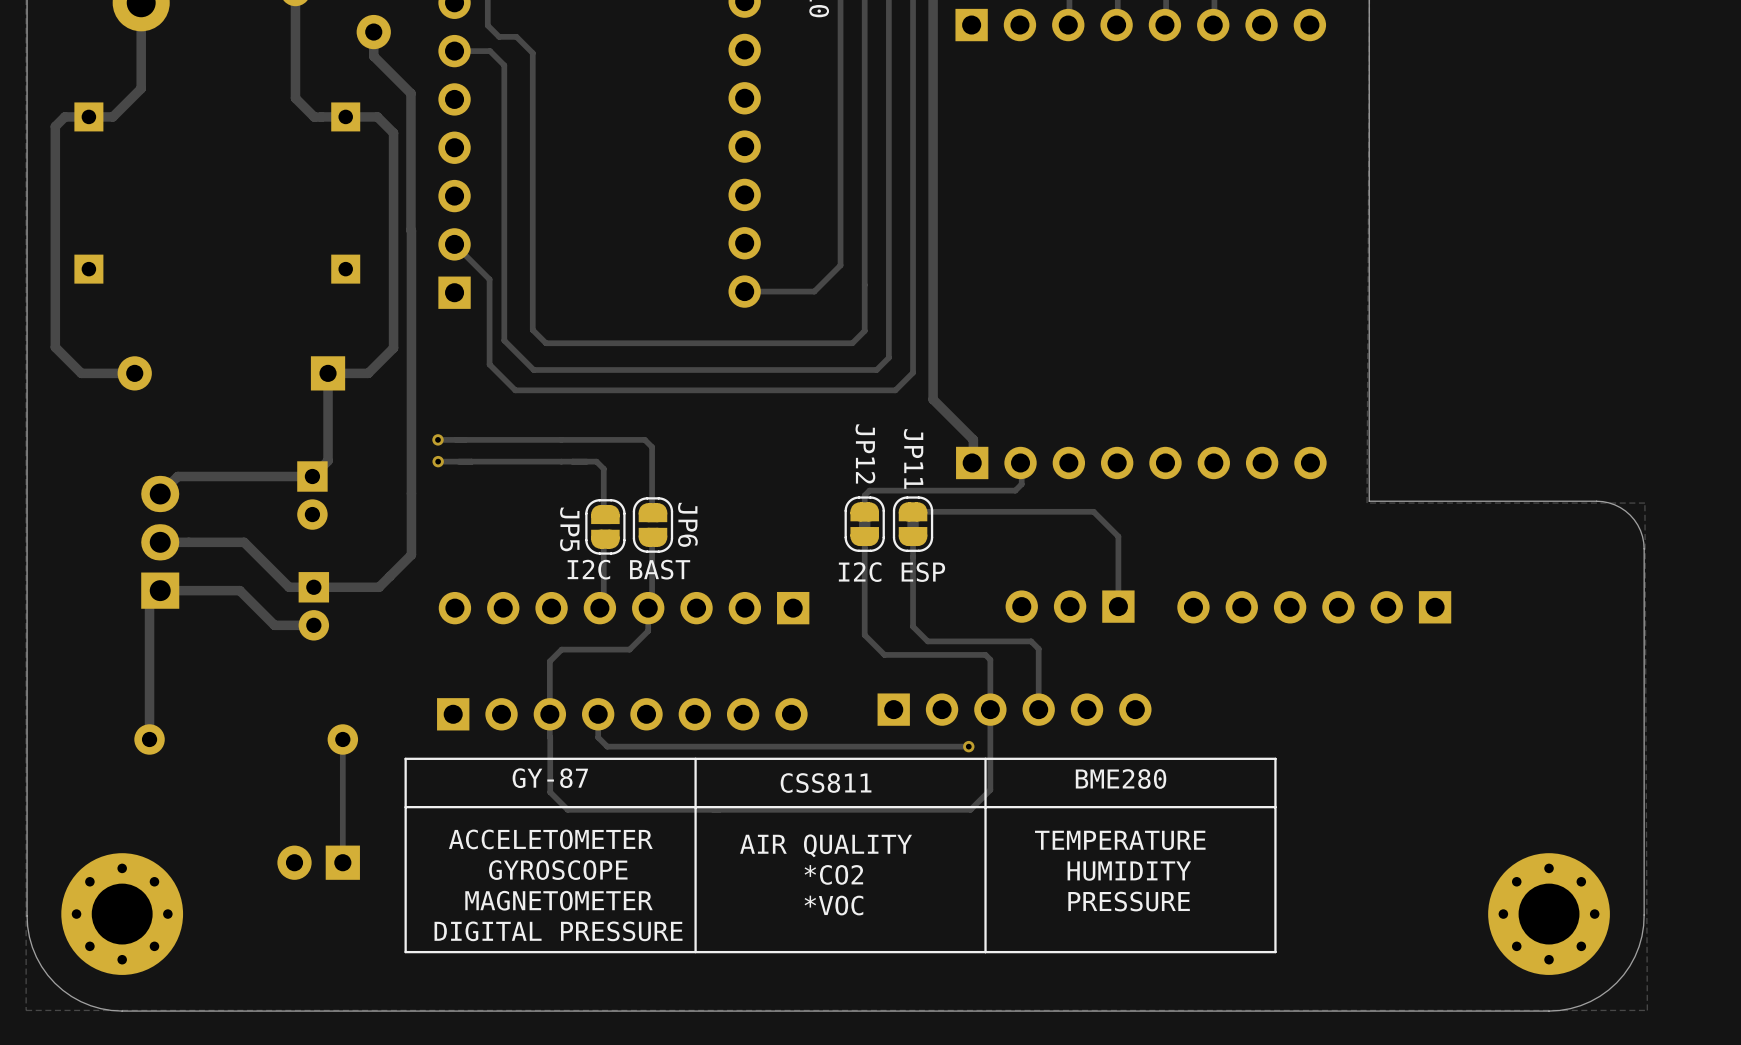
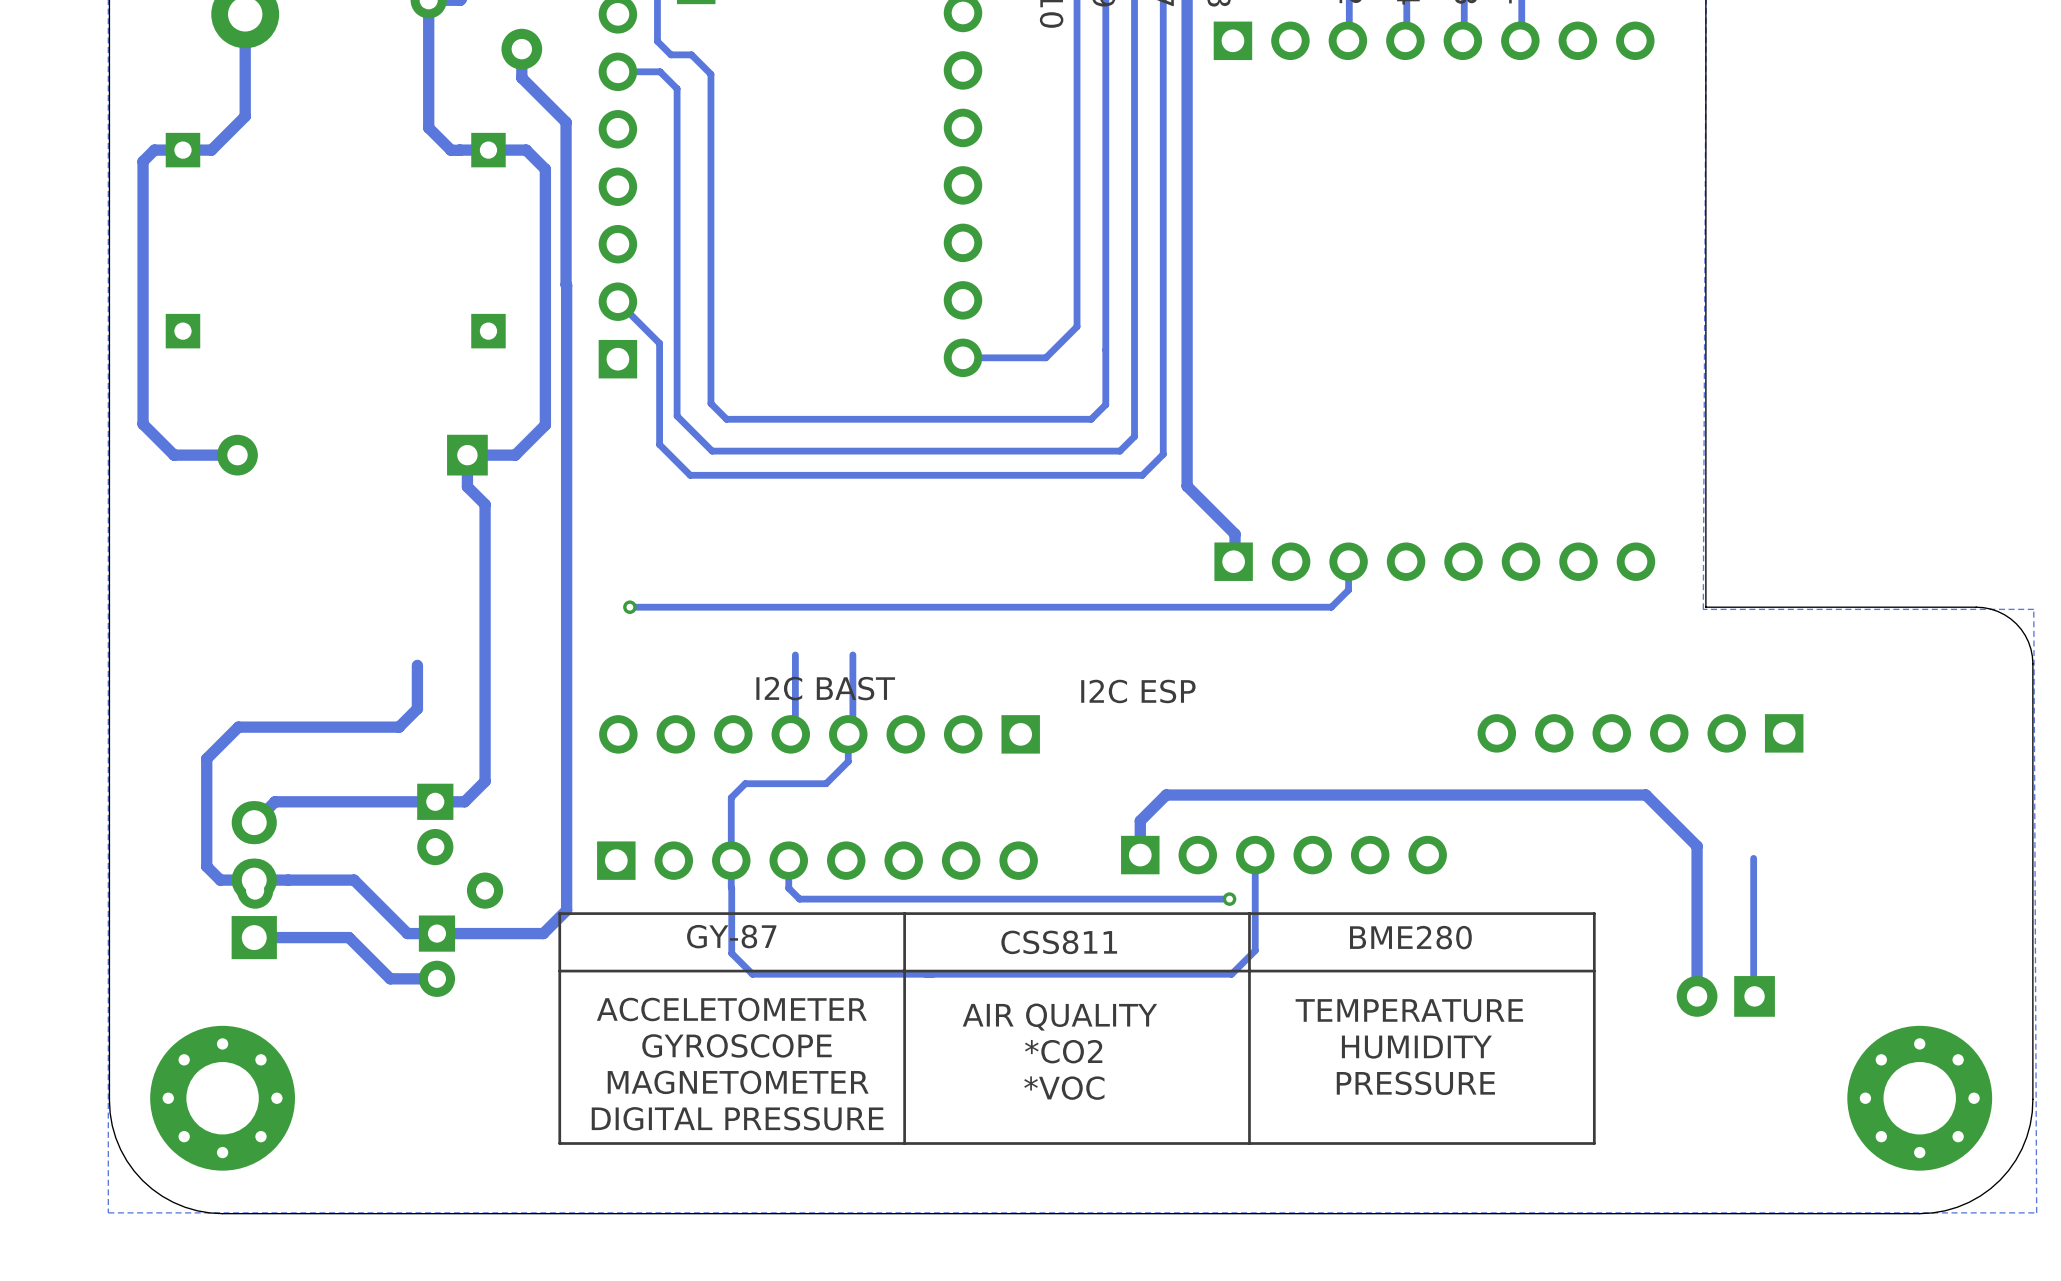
track: (328, 400) (328, 460) (312, 476) (177, 476) (160, 494) -> (467, 486) (485, 504) (485, 781) (464, 801) (275, 801) (254, 822)
track: (437, 439) (644, 439) (652, 447) (652, 512) -> none
via: (437, 439) -> none
track: (438, 461) (596, 461) (603, 468) (603, 512) -> none
via: (438, 461) -> none
track: none -> (1348, 561) (1348, 590) (1331, 607) (629, 607)
track: (1021, 463) (1021, 484) (1015, 490) (869, 490) (864, 495) (864, 511) -> none
part: (312, 495) -> none
via: none -> (629, 607)
track: (913, 511) (1093, 511) (1118, 536) (1118, 606) -> none
JP12: (864, 524) -> none
JP11: (913, 524) -> none
JP6: (652, 525) -> none
JP5: (605, 526) -> none
track: (864, 536) (864, 635) (884, 654) (985, 654) (990, 659) (990, 709) -> none
track: (913, 536) (913, 626) (927, 641) (1031, 641) (1038, 648) (1038, 709) -> none
track: (160, 542) (244, 542) (289, 587) (379, 587) (411, 554) -> (417, 665) (417, 708) (399, 727) (238, 727) (206, 758) (206, 866) (220, 880) (354, 880) (407, 933) (543, 933) (566, 910) (566, 671)
part position: (160, 542) -> (254, 880)
part position: (313, 606) -> (435, 824)
part: (1070, 606) -> none
track: (313, 625) (274, 625) (239, 590) (160, 590) (149, 601) (149, 739) -> none
track: none -> (1140, 855) (1140, 820) (1166, 795) (1645, 795) (1697, 846) (1697, 996)
track: none -> (1753, 858) (1754, 996)
track: (342, 739) (342, 862) -> none
track: none -> (241, 950) (254, 937) (349, 937) (390, 978) (436, 978)
part: none -> (436, 956)
part: none -> (1725, 996)
part: (318, 862) -> none

